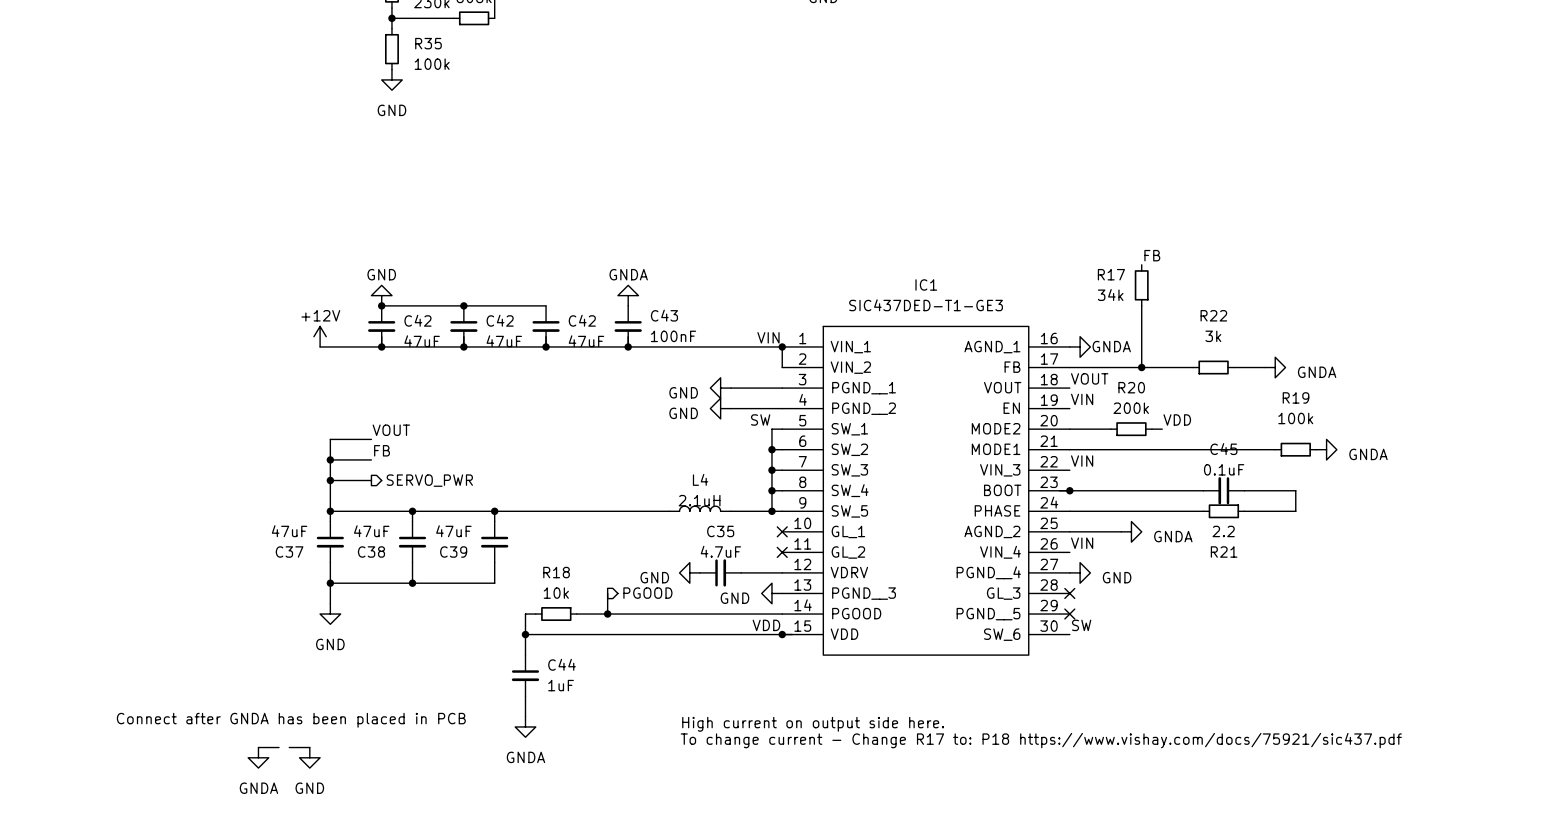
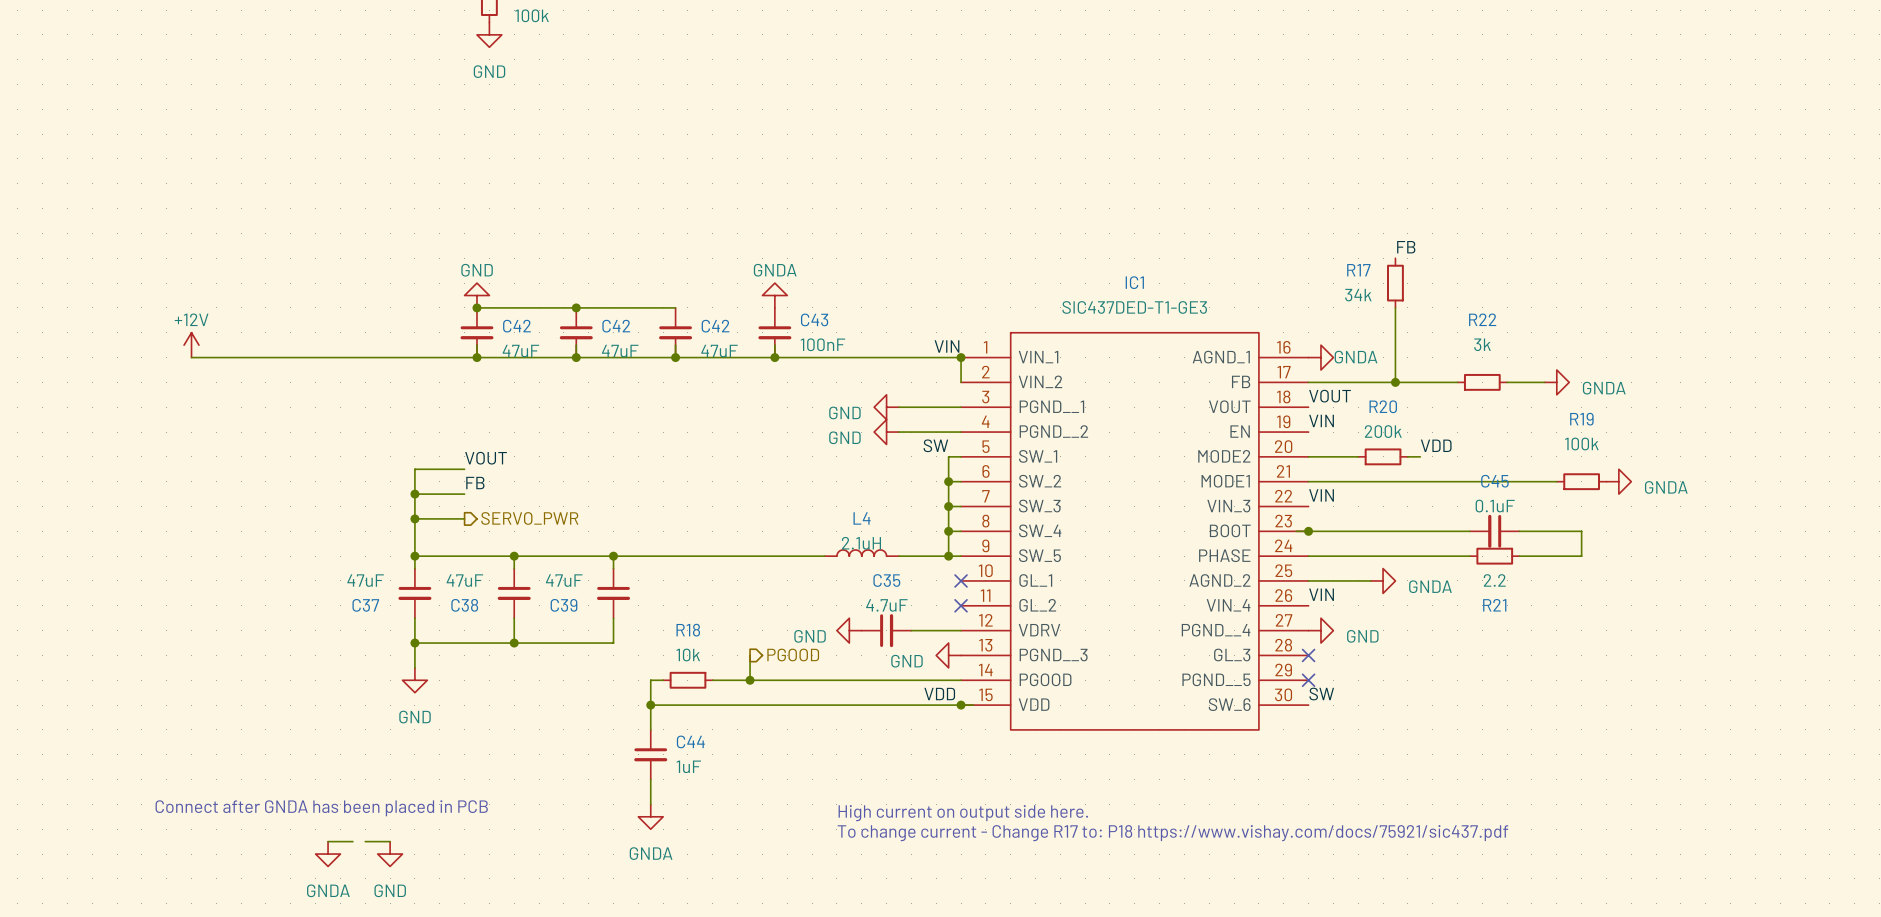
power symbol position: +12V (320, 336) -> +12V (191, 345)
wire: none -> (191, 357) (402, 357)

